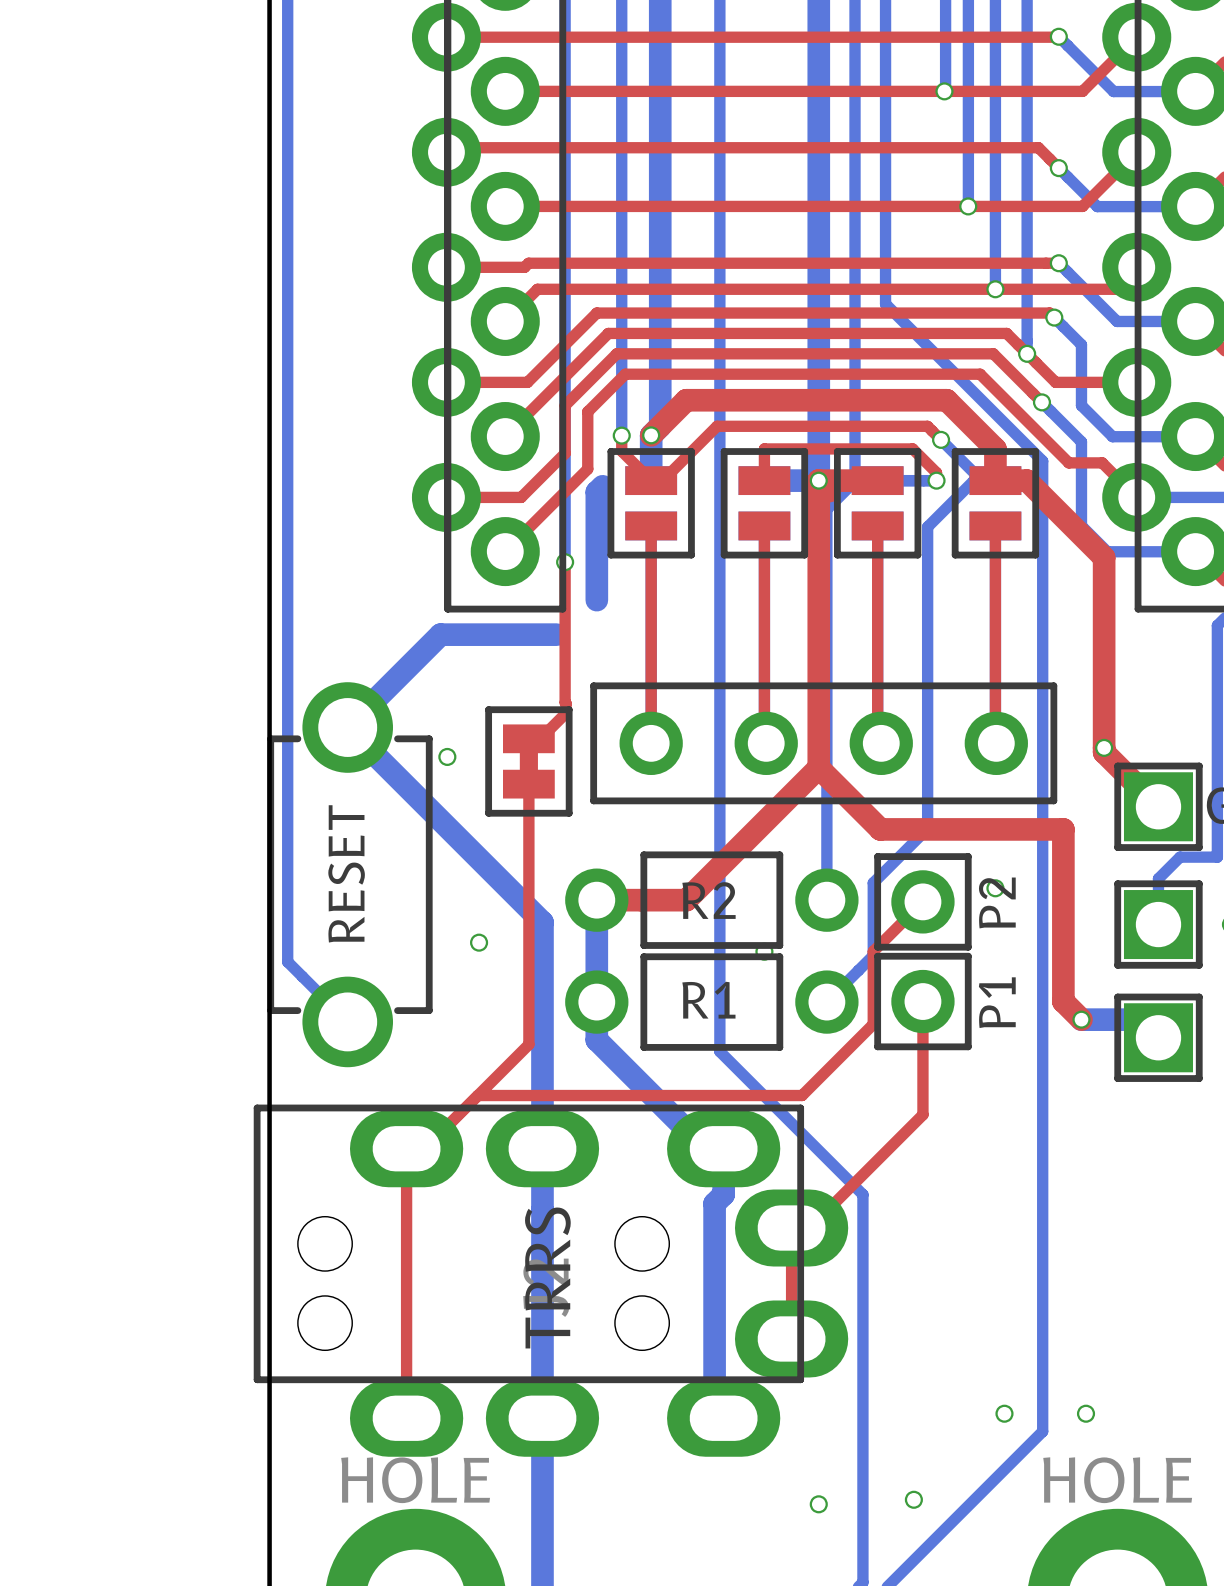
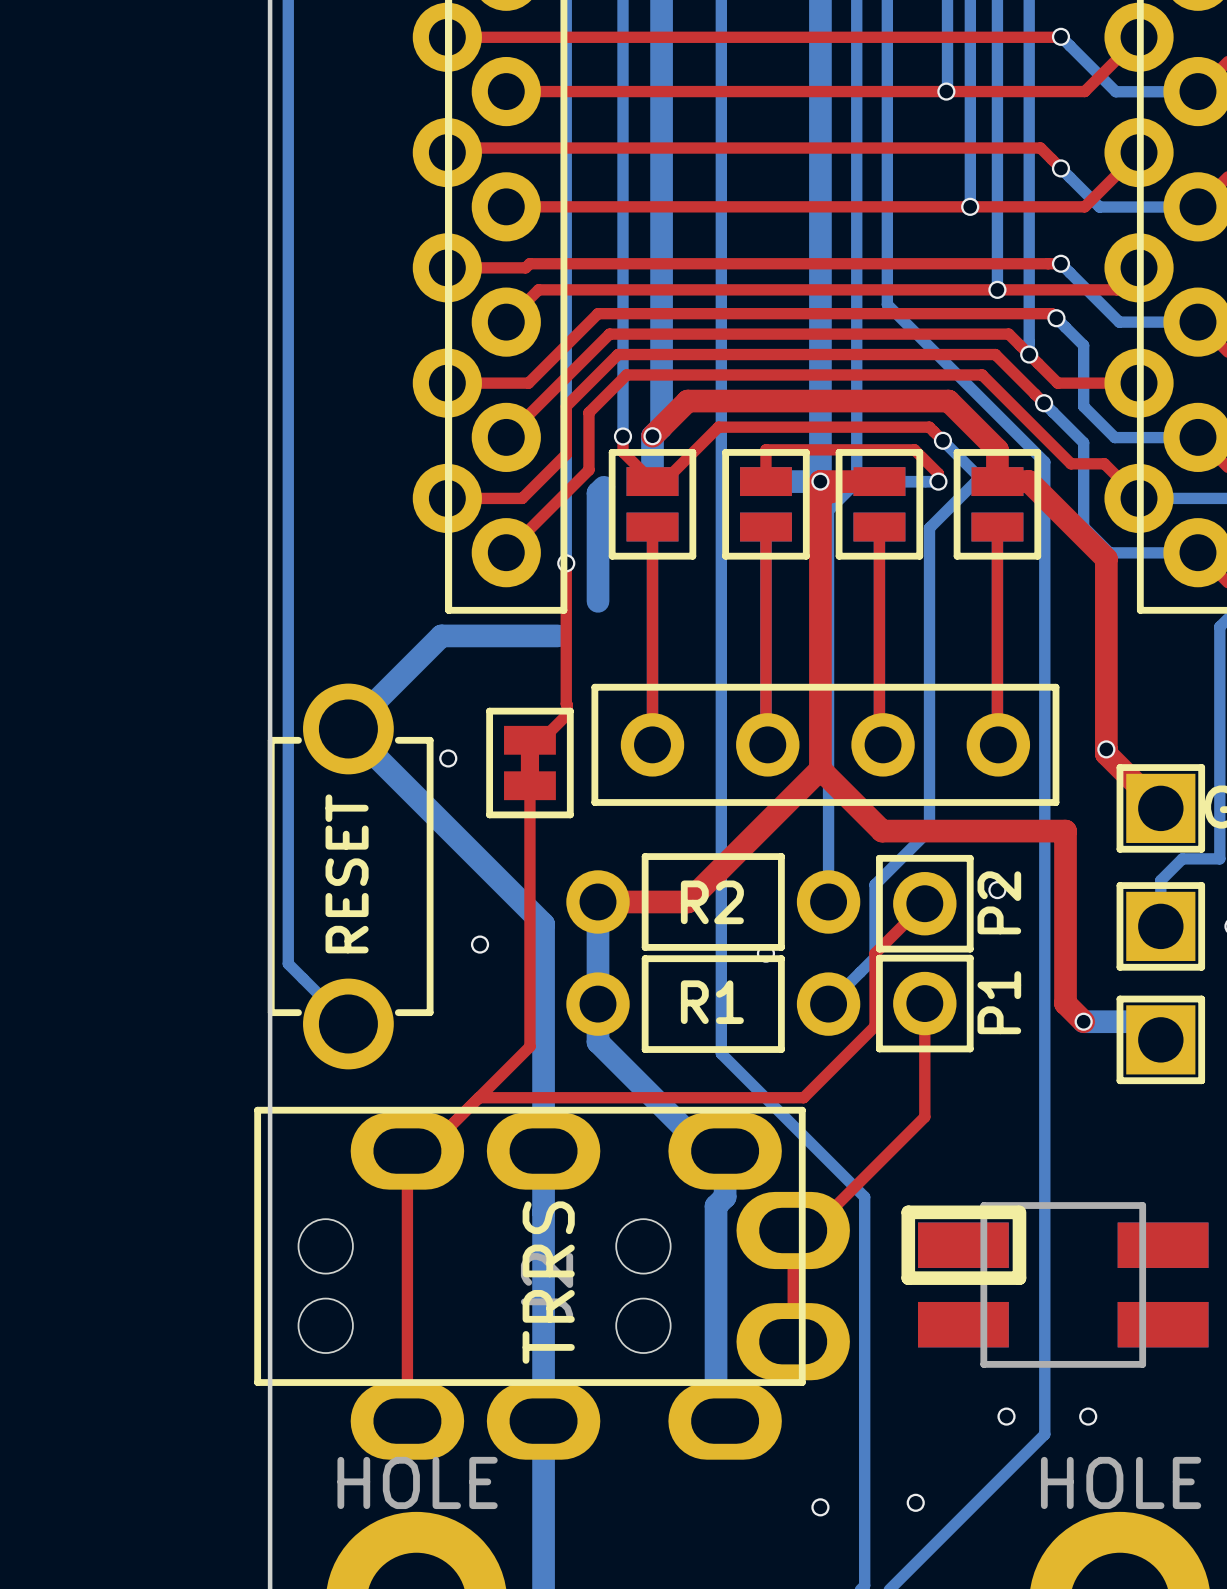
part: none -> (1054, 1284)

